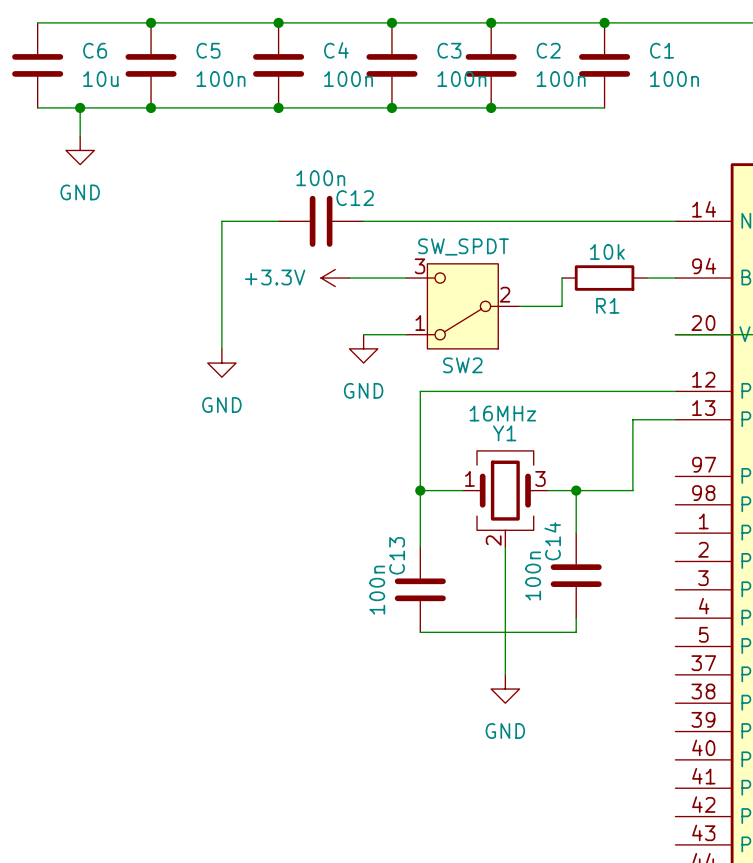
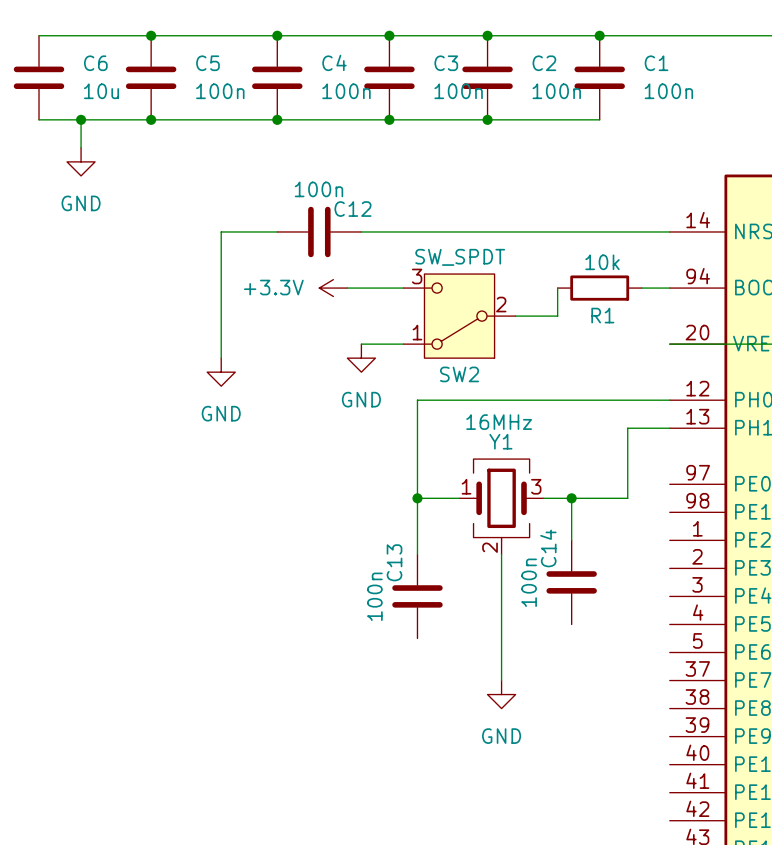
wire: (576, 618) (576, 632) (420, 632) -> none

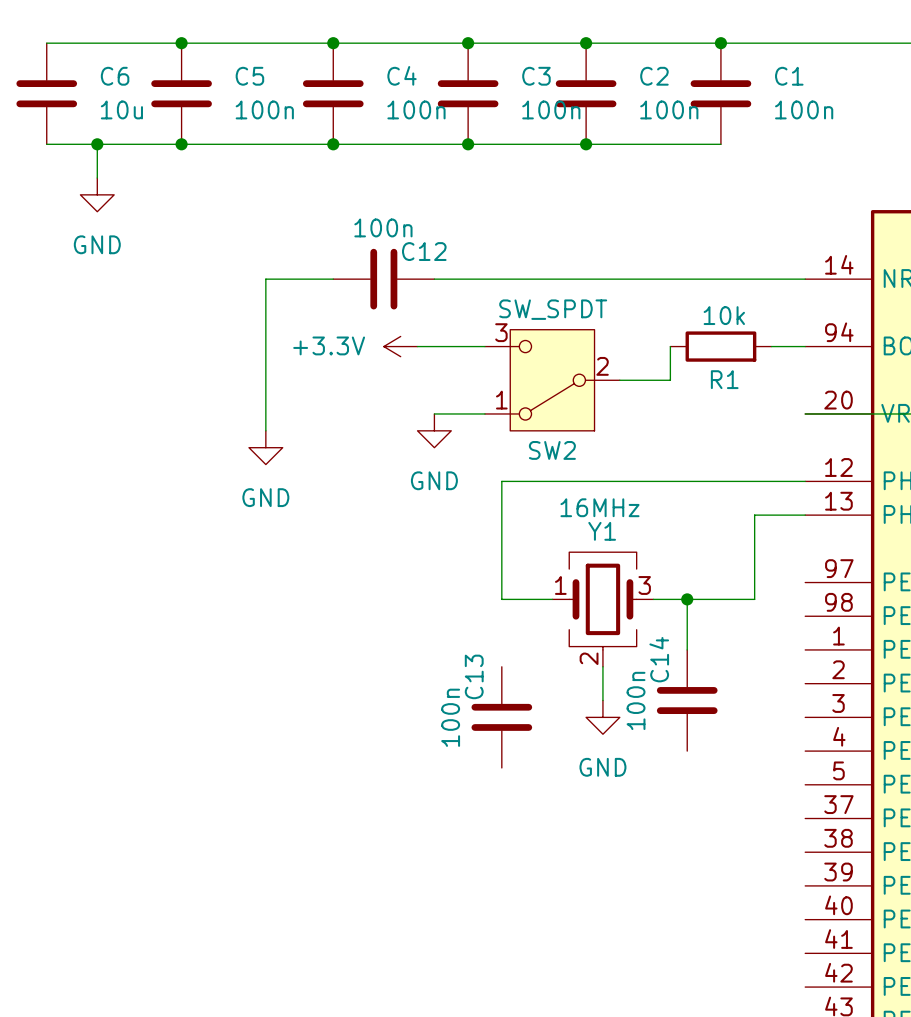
wire: (417, 498) (417, 554) -> none
junction: (417, 498) -> none
wire: (501, 582) (501, 680) -> none
power symbol position: GND (501, 694) -> GND (602, 717)

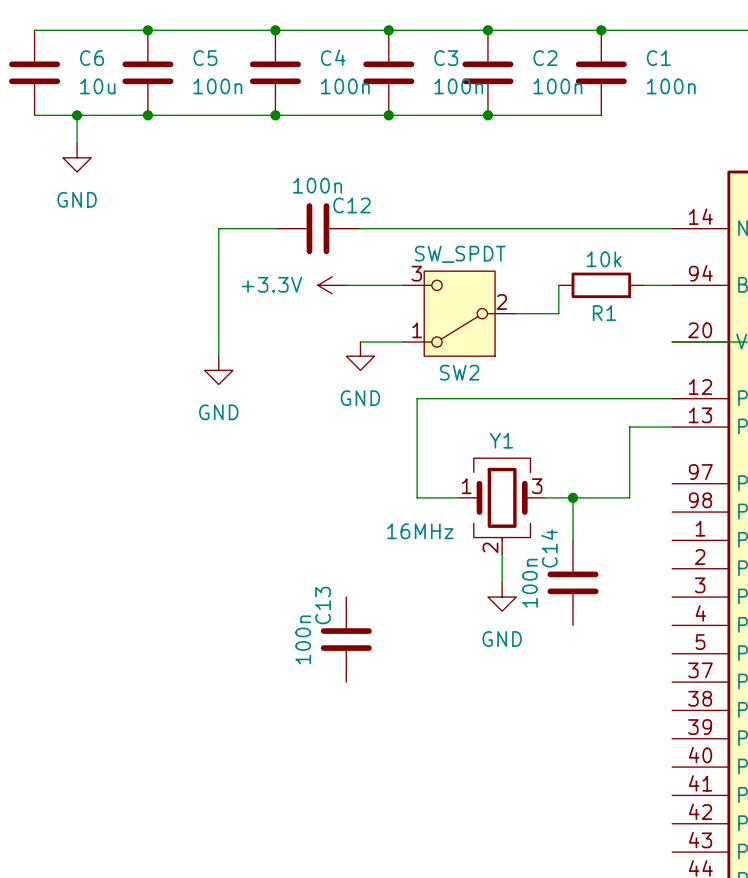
Y1 value position: 16MHz (599, 507) -> 16MHz (420, 531)
C13 position: (501, 717) -> (346, 639)

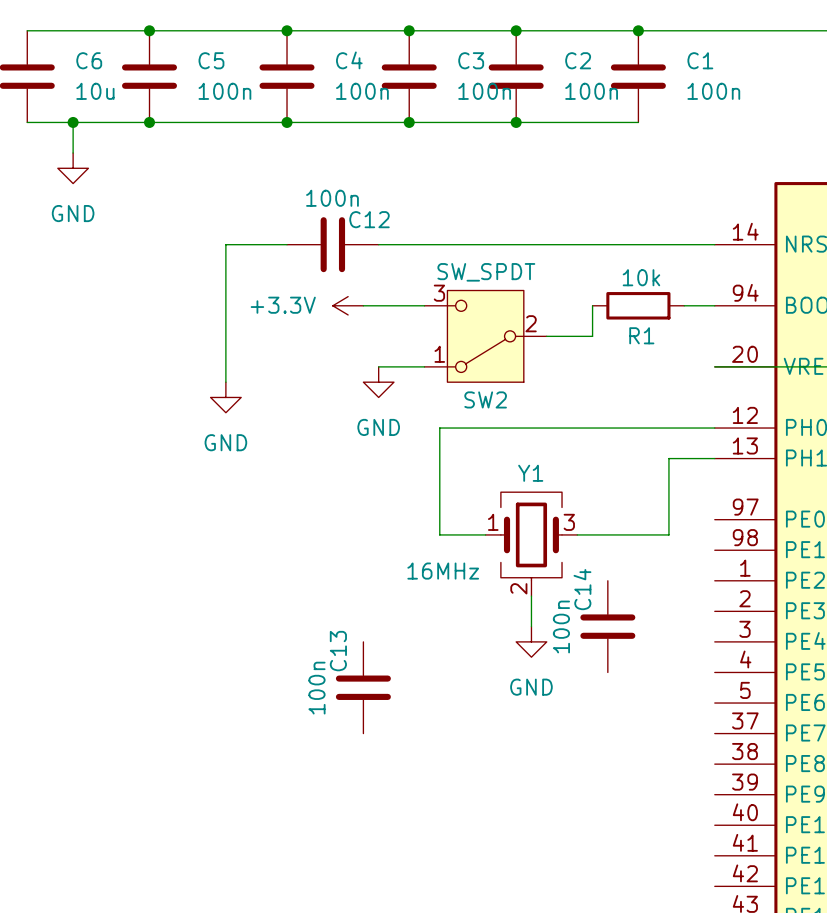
wire: (572, 497) (572, 540) -> none
junction: (572, 497) -> none

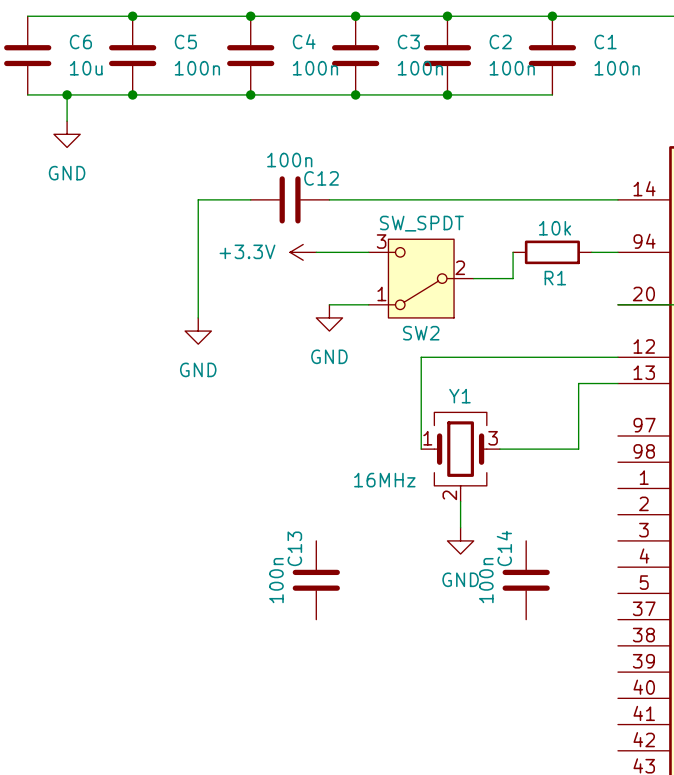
wire: (485, 428) (439, 428) (439, 534) (485, 534) -> (421, 357) (421, 449)
C14 position: (607, 626) -> (526, 580)

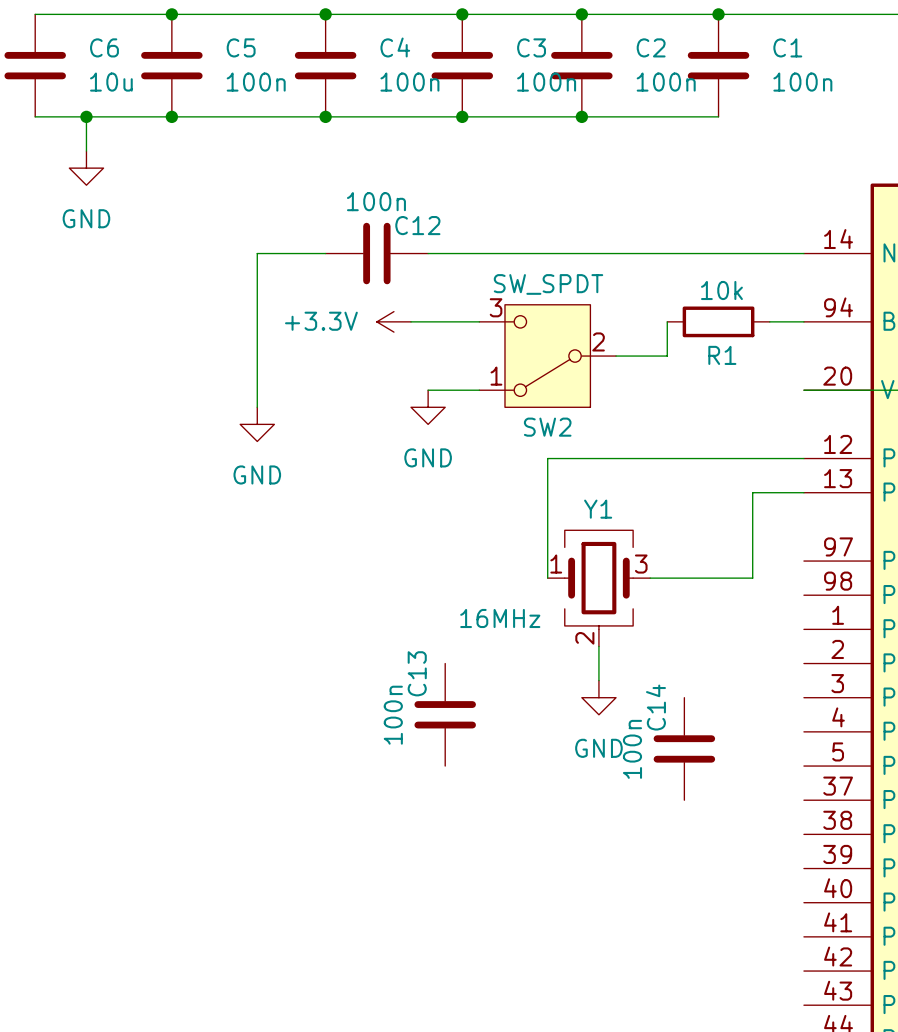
C13 position: (316, 580) -> (445, 714)

